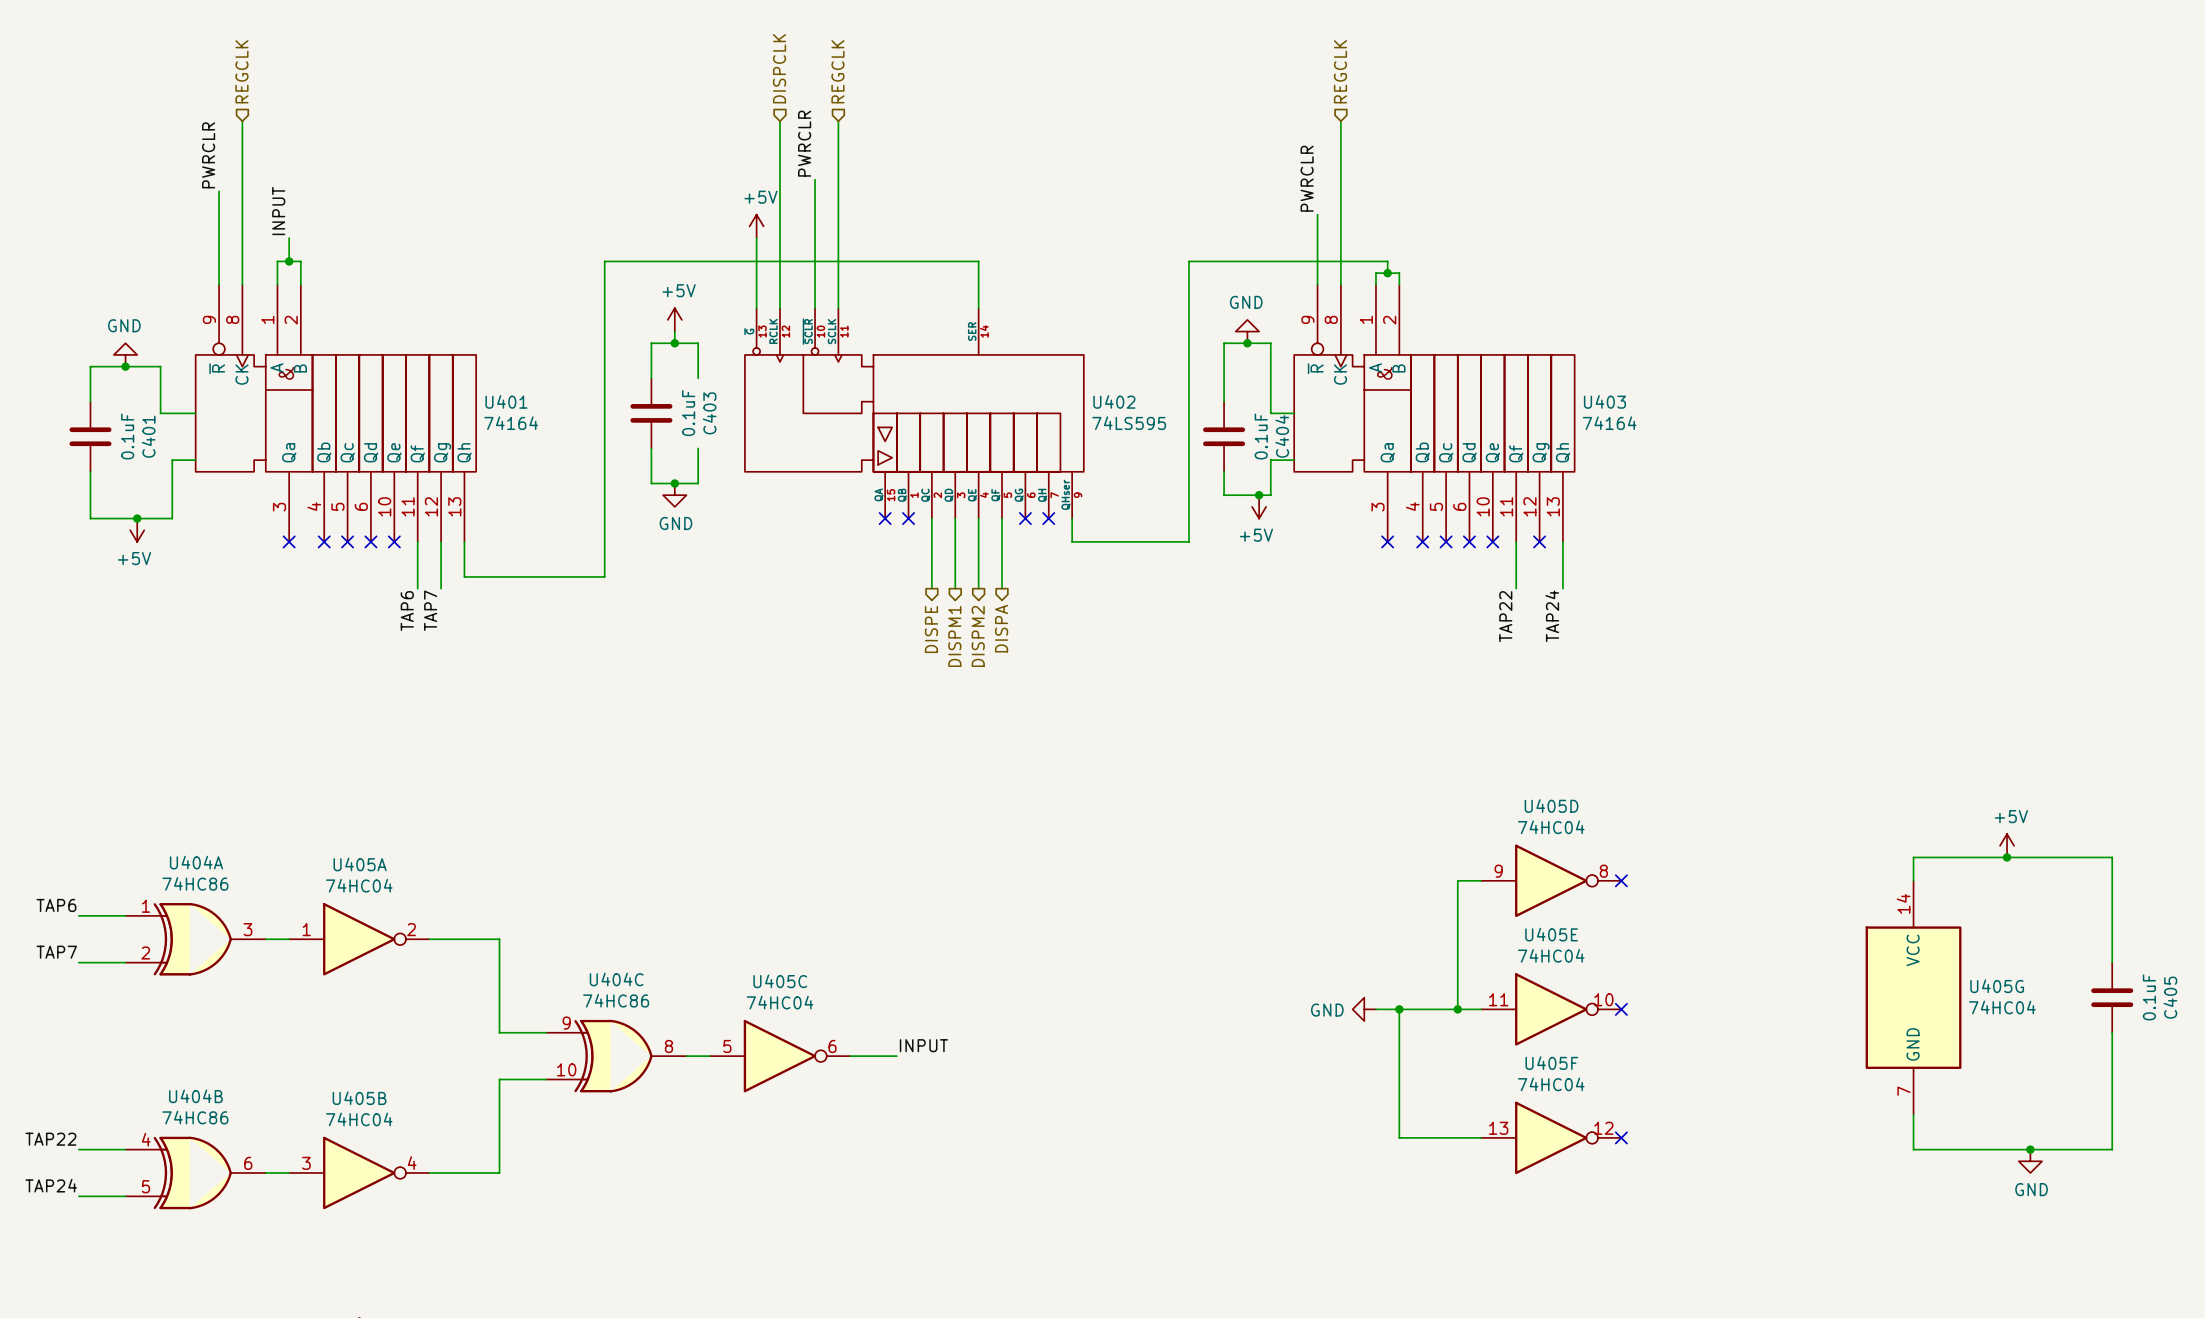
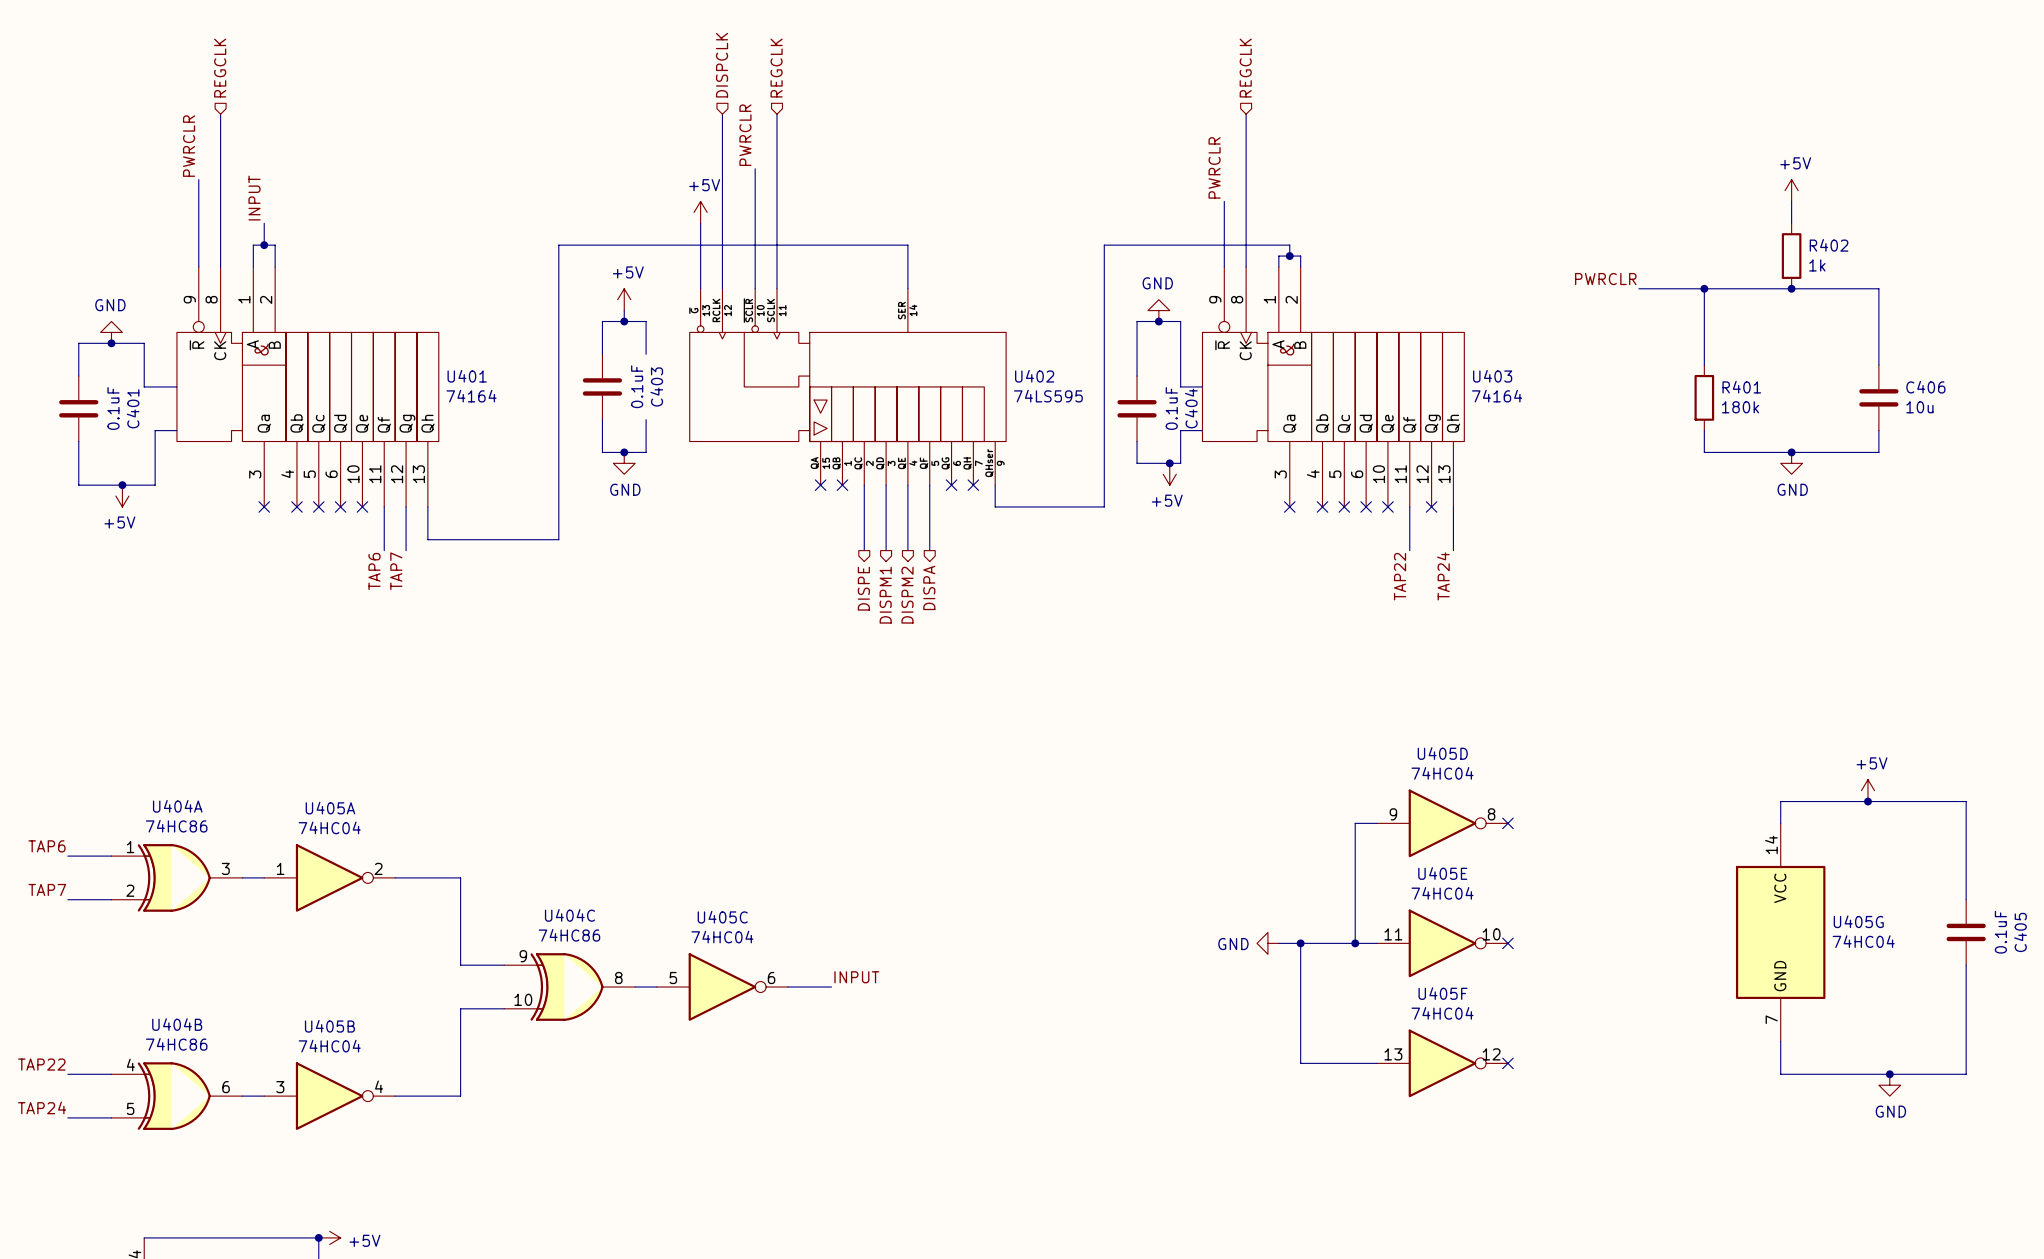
power symbol: none -> +5V (1791, 190)
wire: none -> (1791, 201) (1791, 223)
R402: none -> 1k (1791, 256)
label: none -> PWRCLR (1605, 279)
wire: none -> (1638, 288) (1878, 288) (1878, 365)
wire: none -> (1704, 288) (1704, 365)
junction: none -> (1704, 288)
junction: none -> (1791, 288)
R401: none -> 180k (1704, 397)
C406: none -> 10u (1878, 397)
wire: none -> (1704, 430) (1704, 452) (1878, 452) (1878, 430)
junction: none -> (1791, 452)
power symbol: none -> GND (1791, 463)

